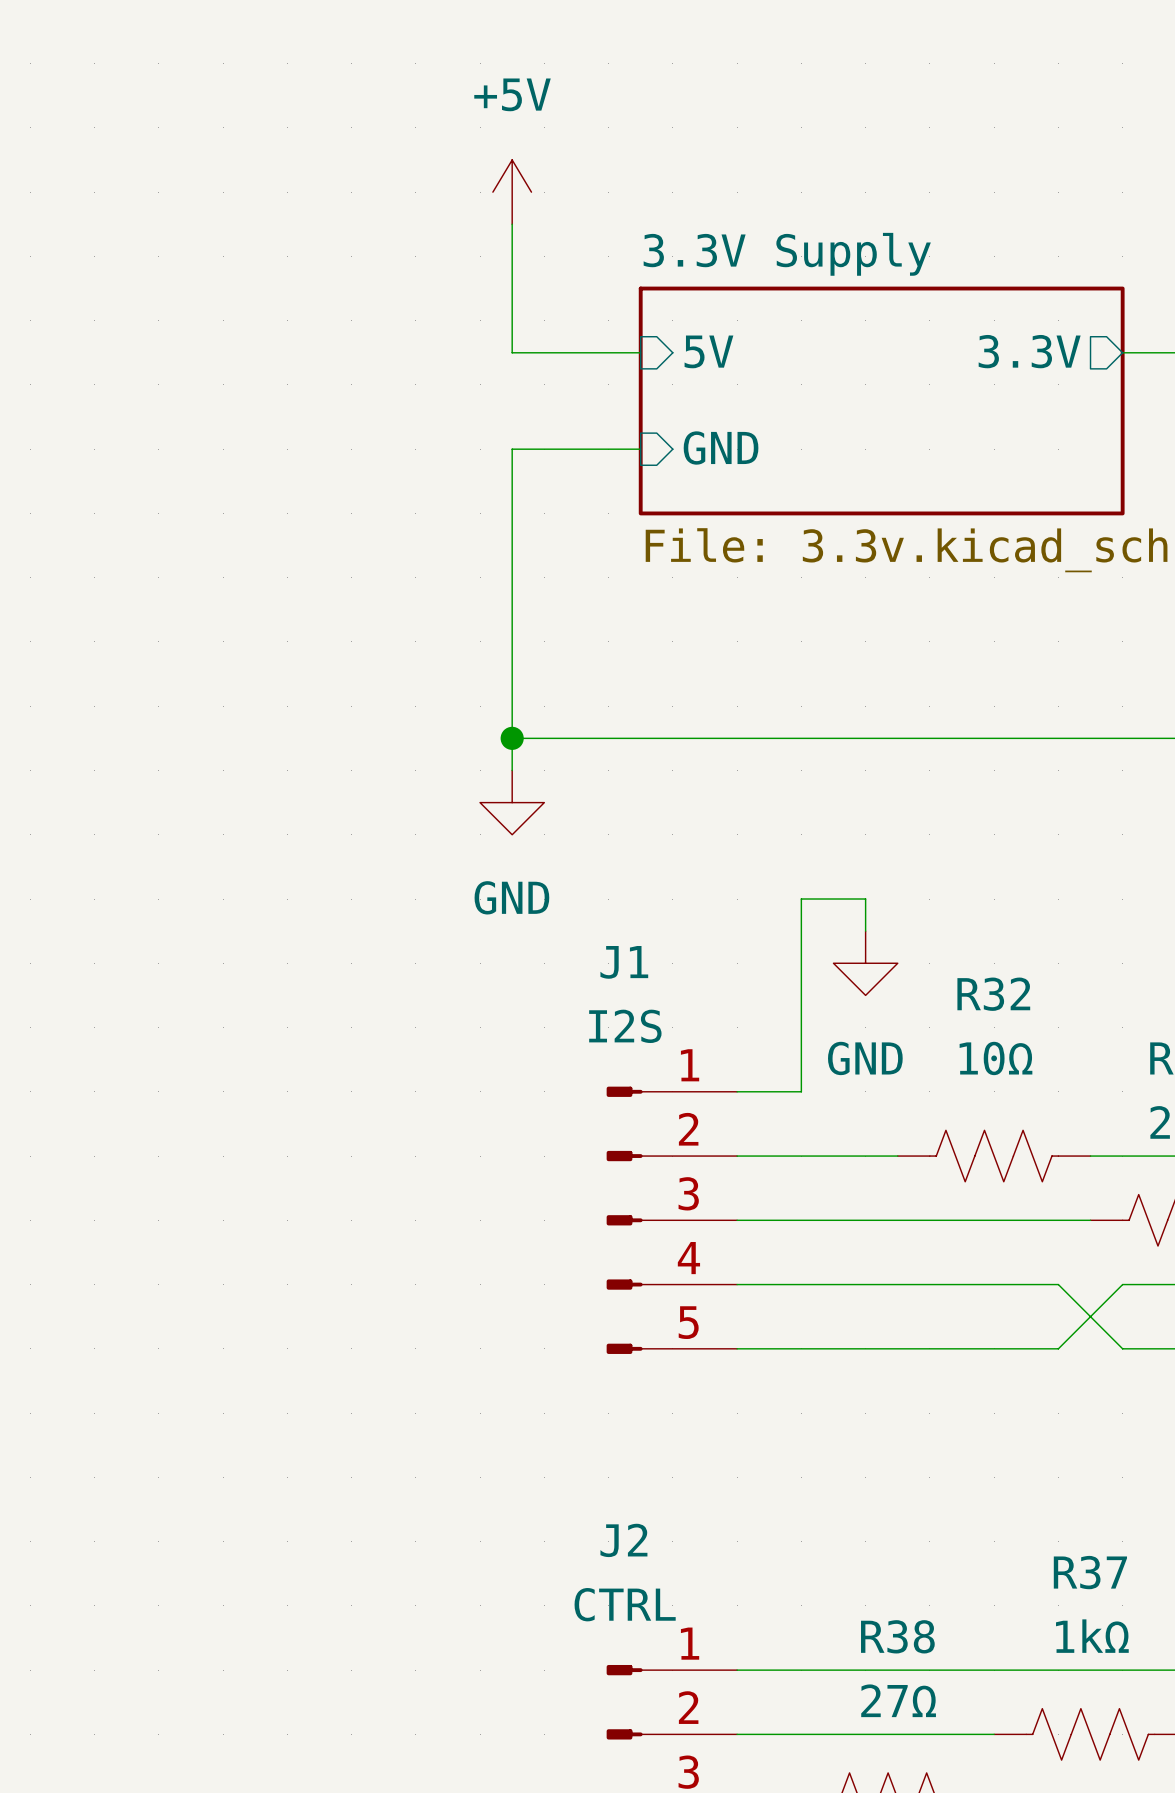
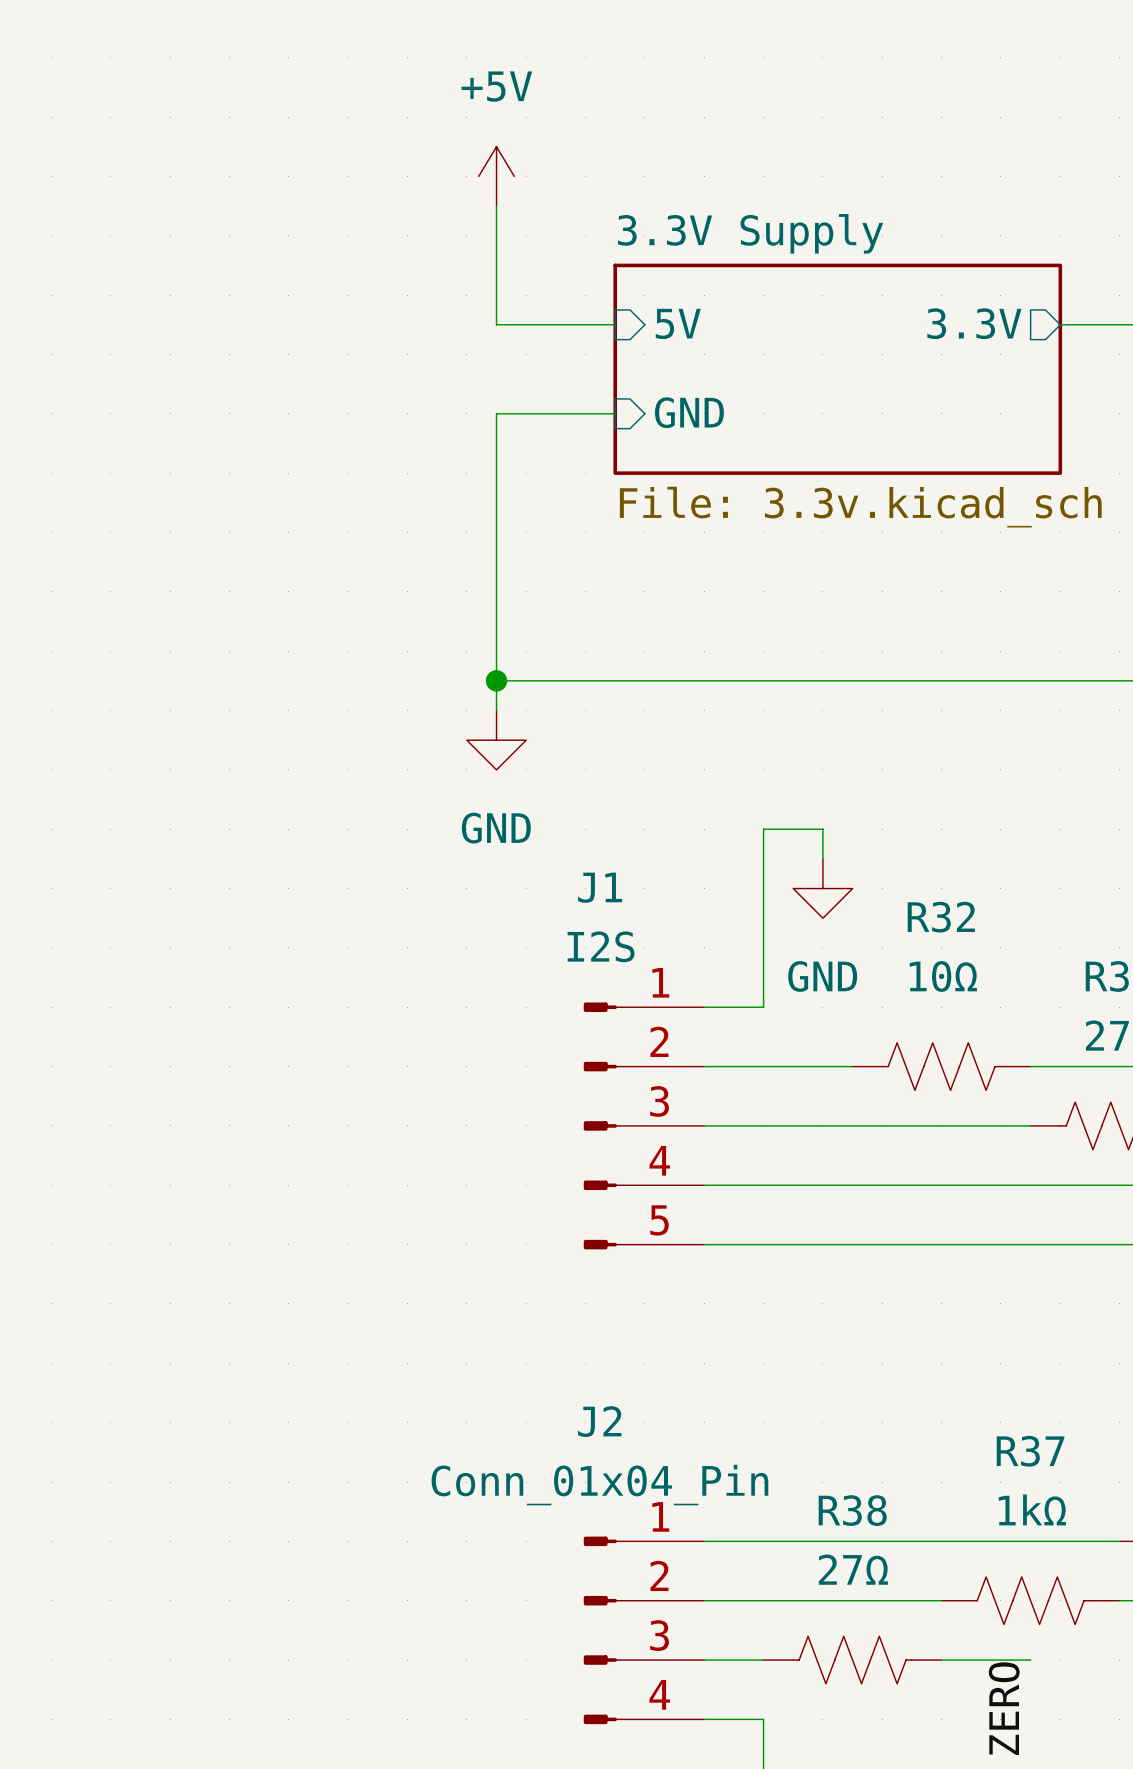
wire: (1058, 1284) (1122, 1348) -> (1000, 1185) (1060, 1185)
wire: (1122, 1284) (1058, 1348) -> (1060, 1244) (1000, 1244)
J2 value: CTRL (625, 1604) -> Conn_01x04_Pin (599, 1485)

